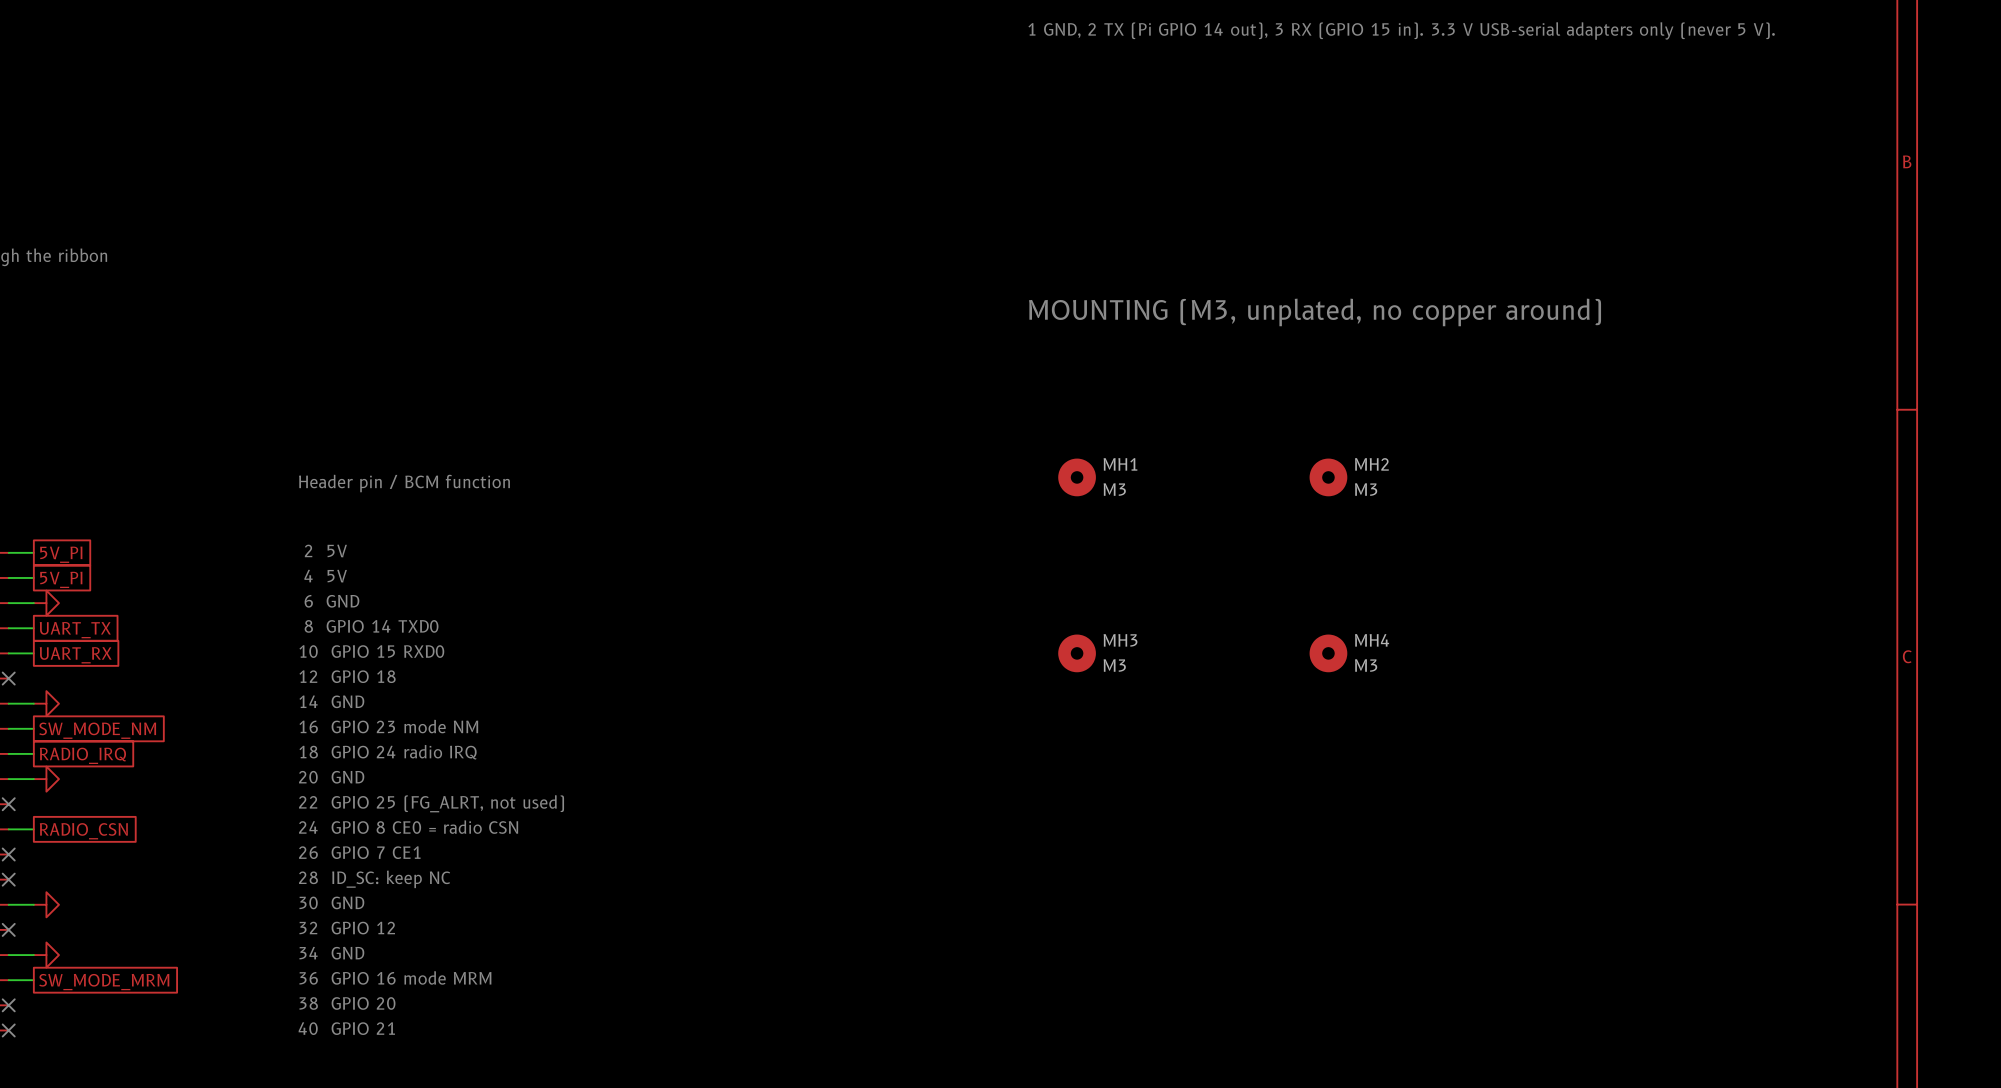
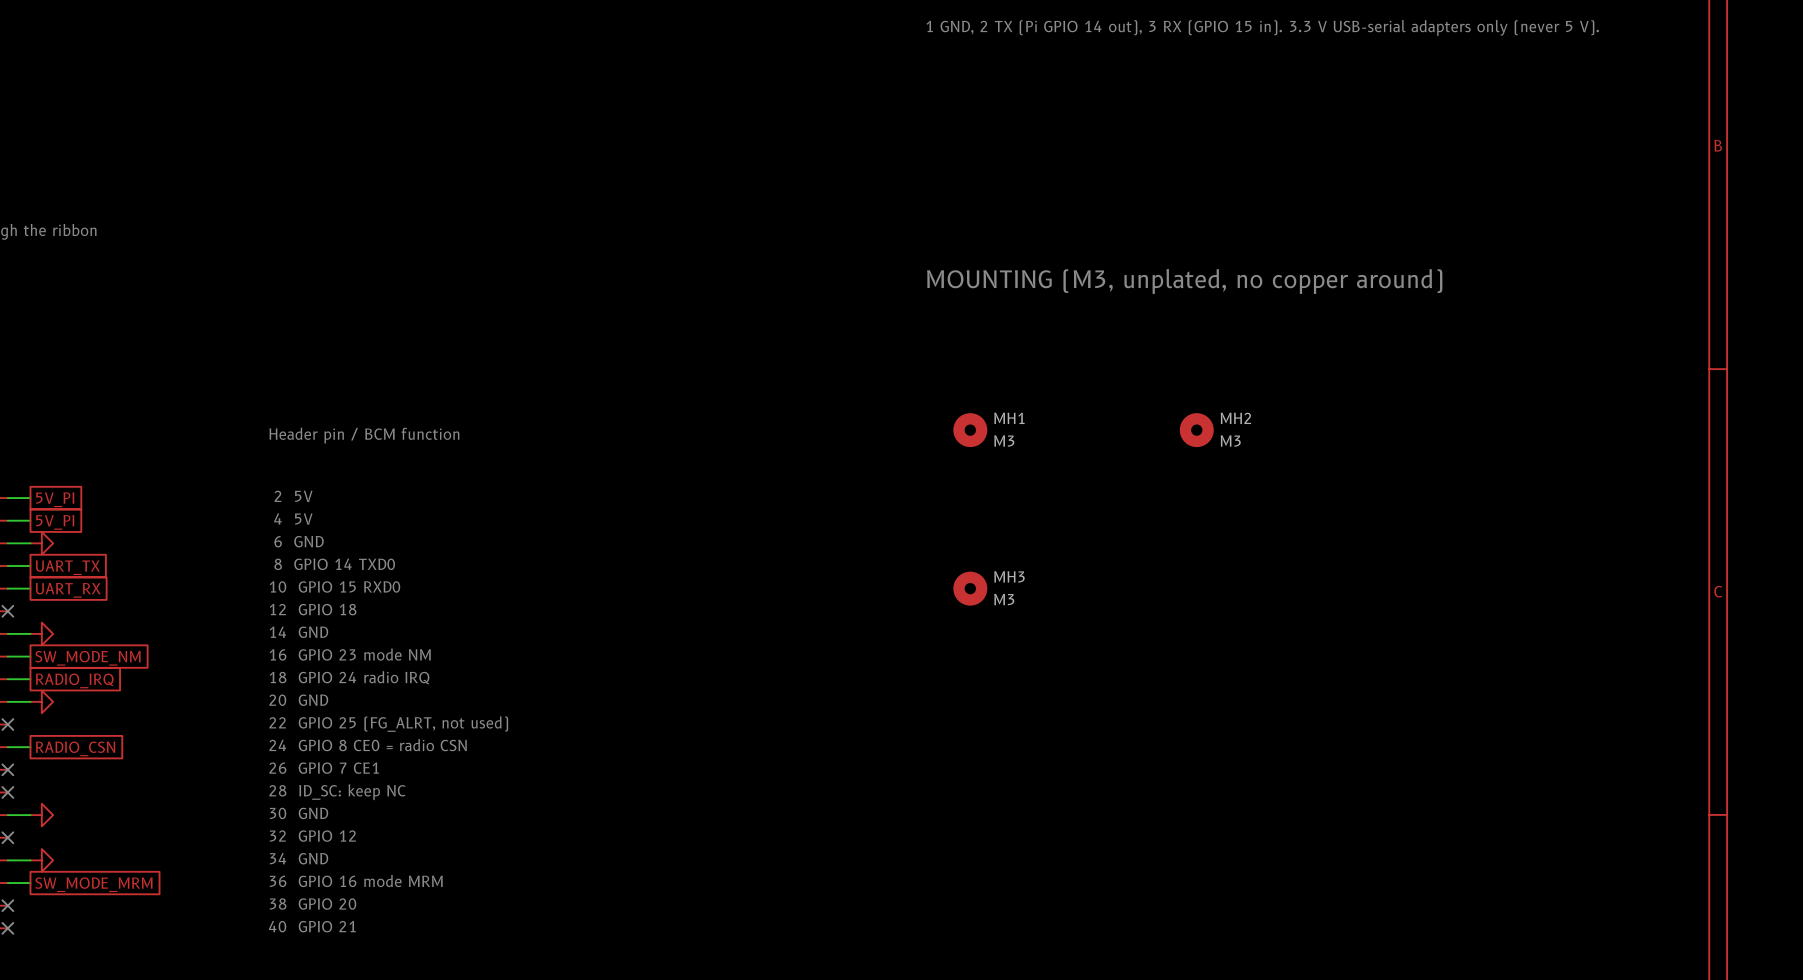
MH4: M3 (1328, 653) -> none

